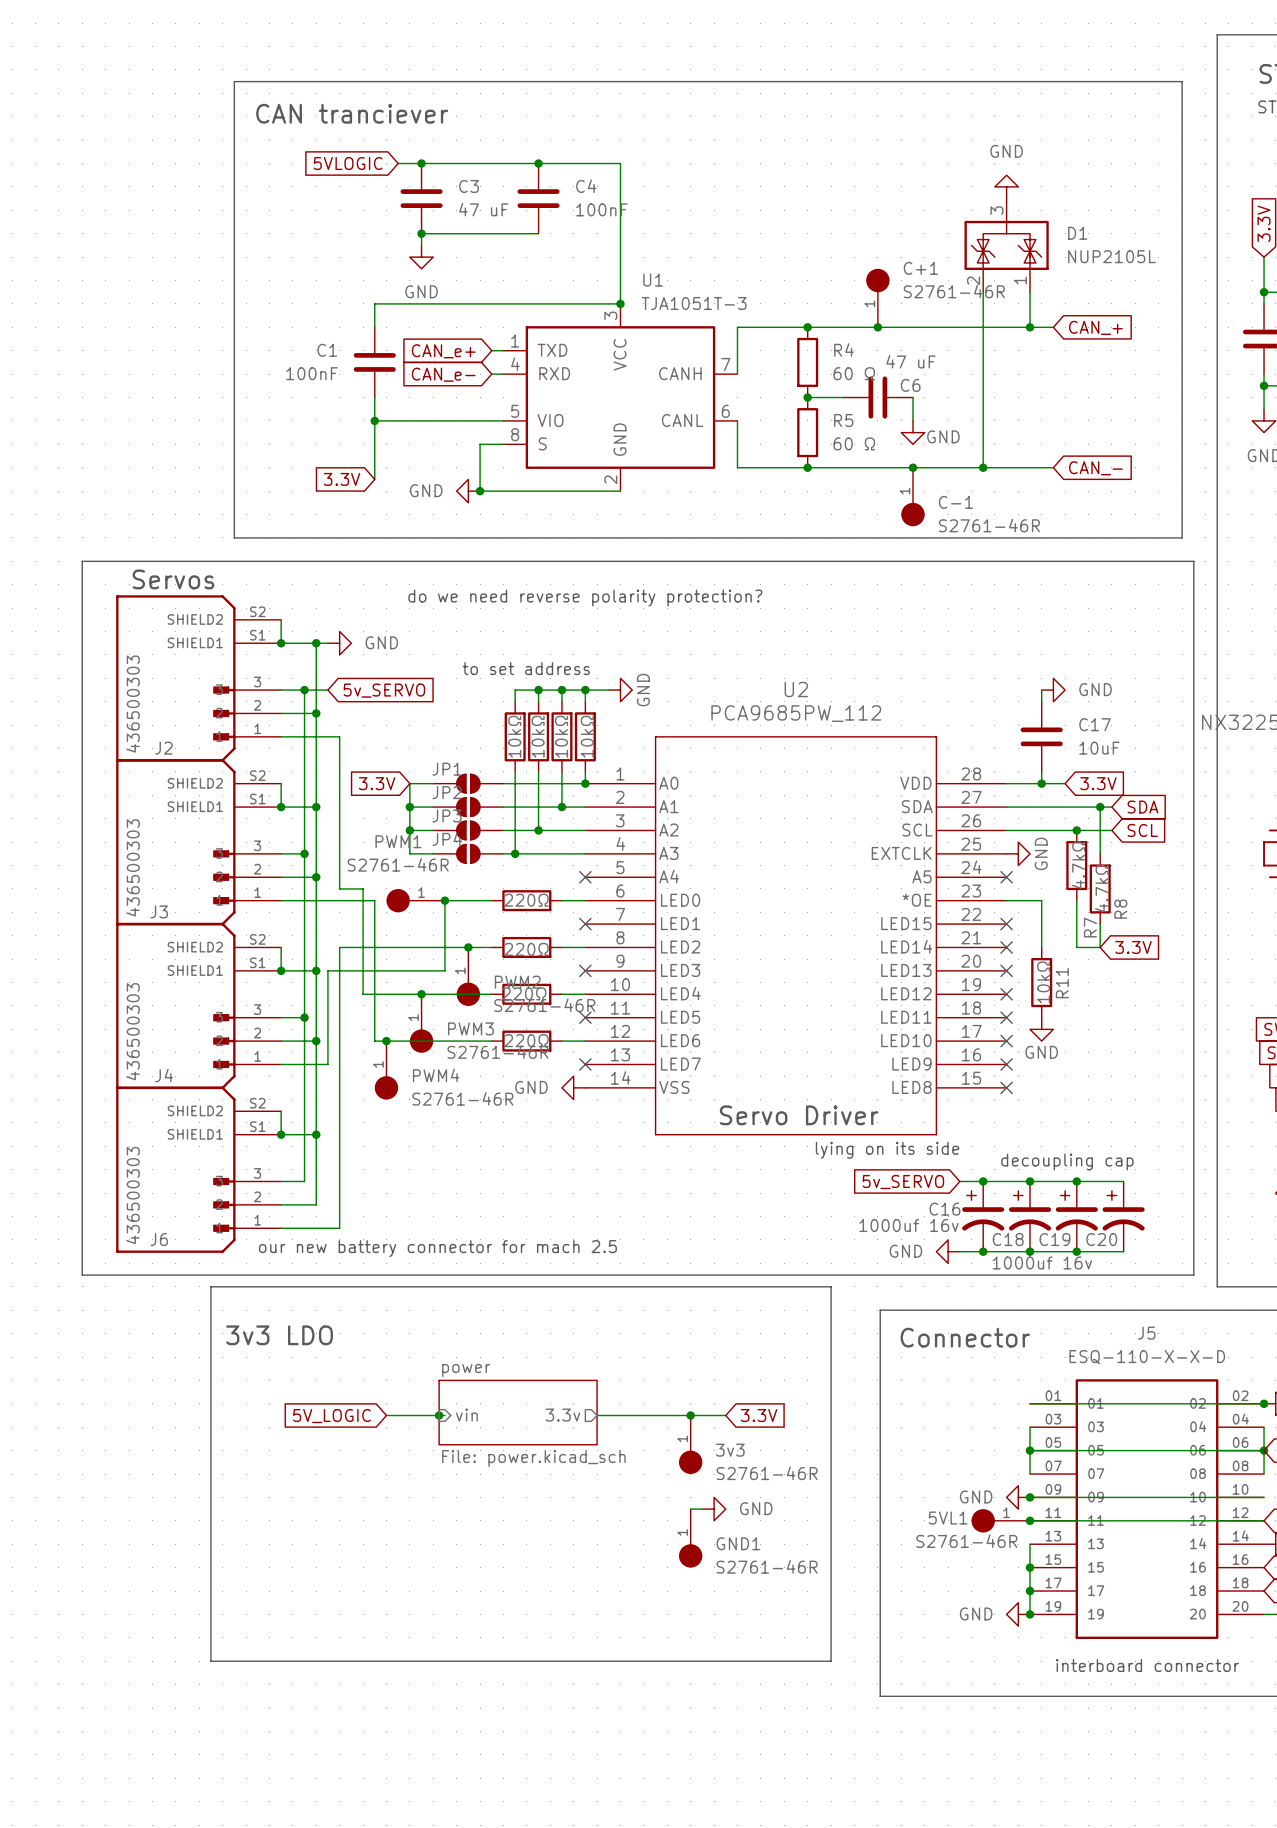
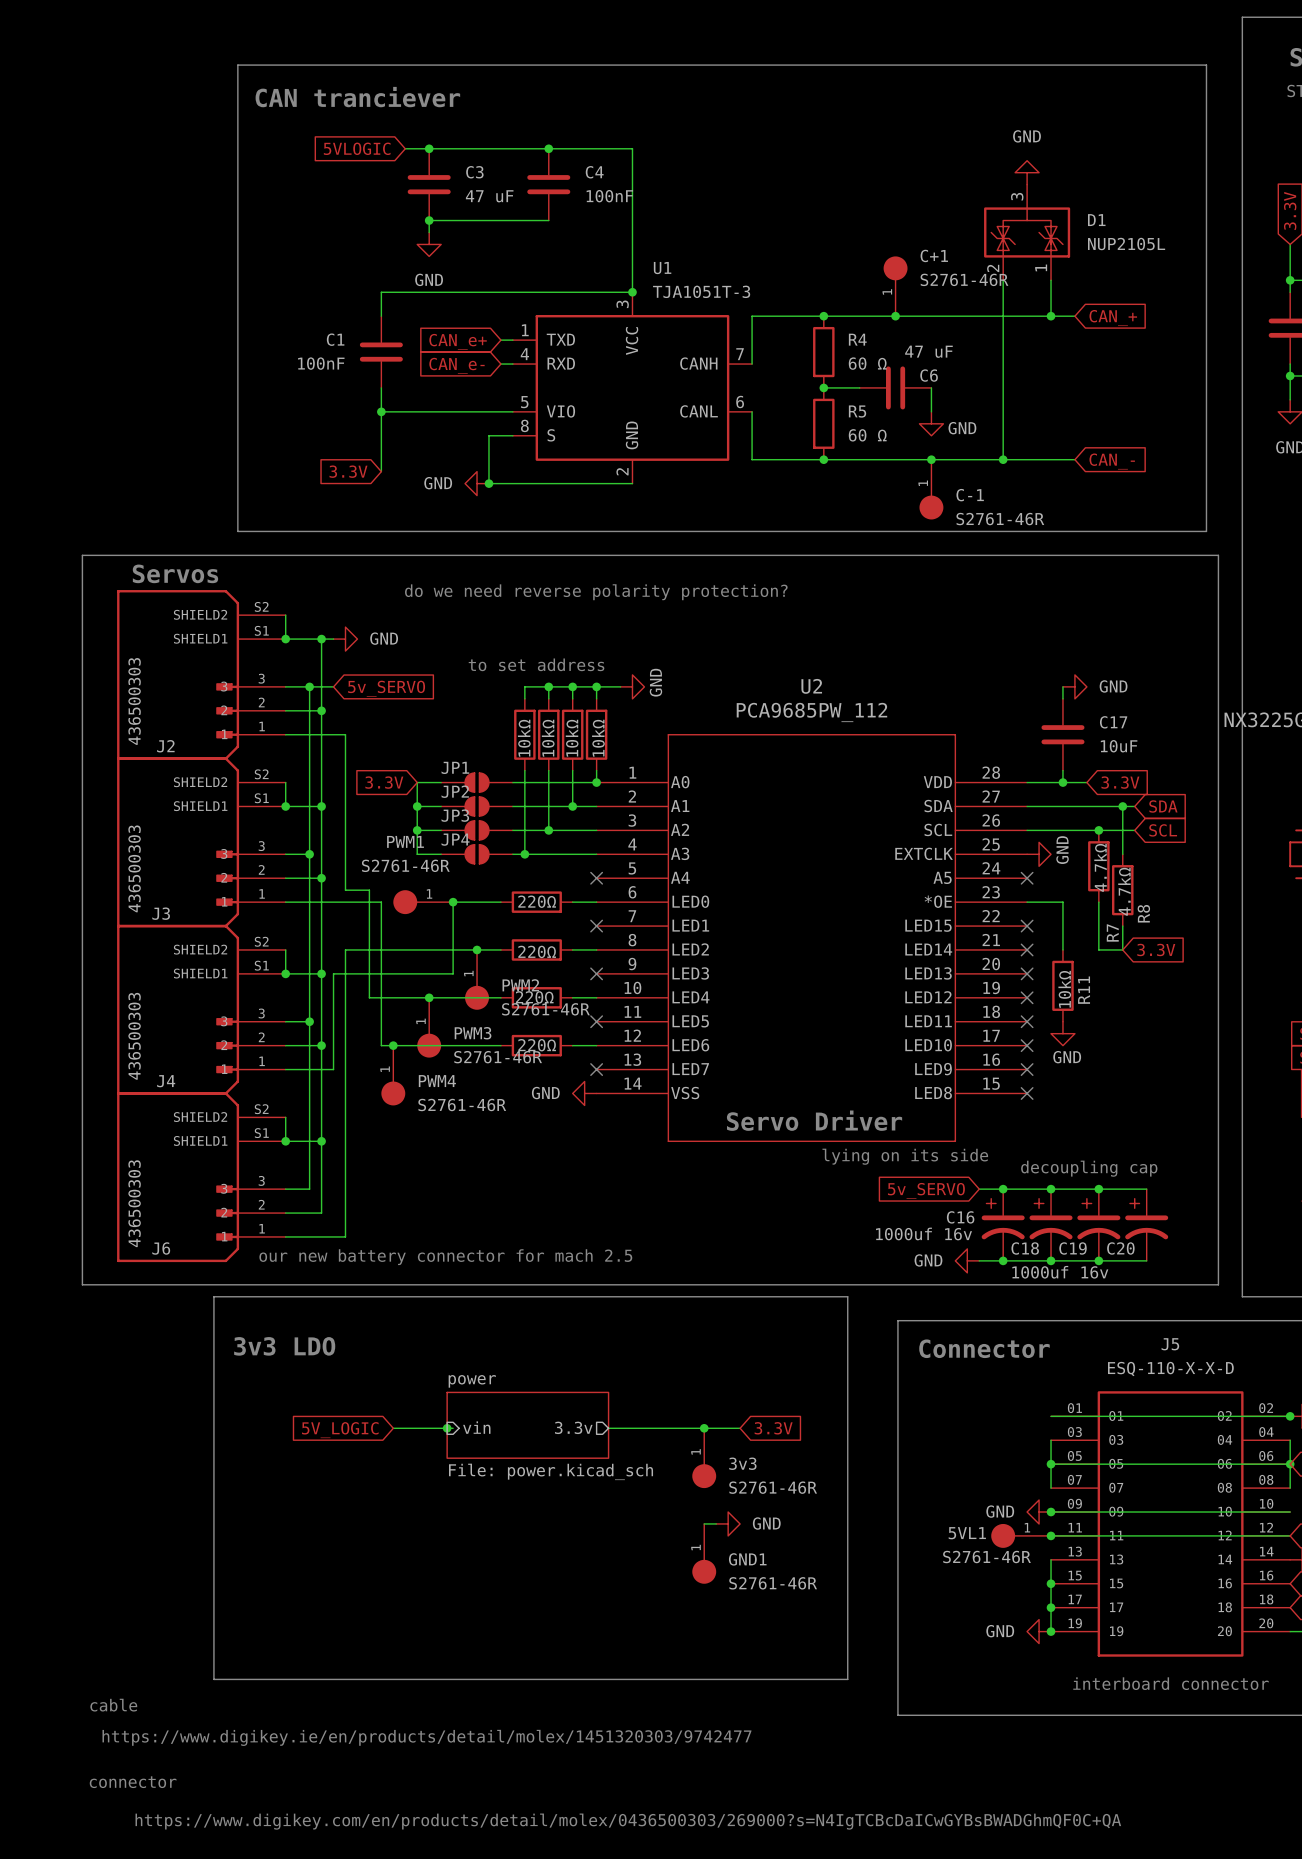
text: none -> cable (113, 1705)
text: none -> https://www.digikey.ie/en/products/detail/molex/1451320303/9742477 (426, 1737)
text: none -> connector (133, 1782)
text: none -> https://www.digikey.com/en/products/detail/molex/0436500303/269000?s=N4IgTCBcDaICwGYBsBWADGhmQF0C+QA (628, 1821)

